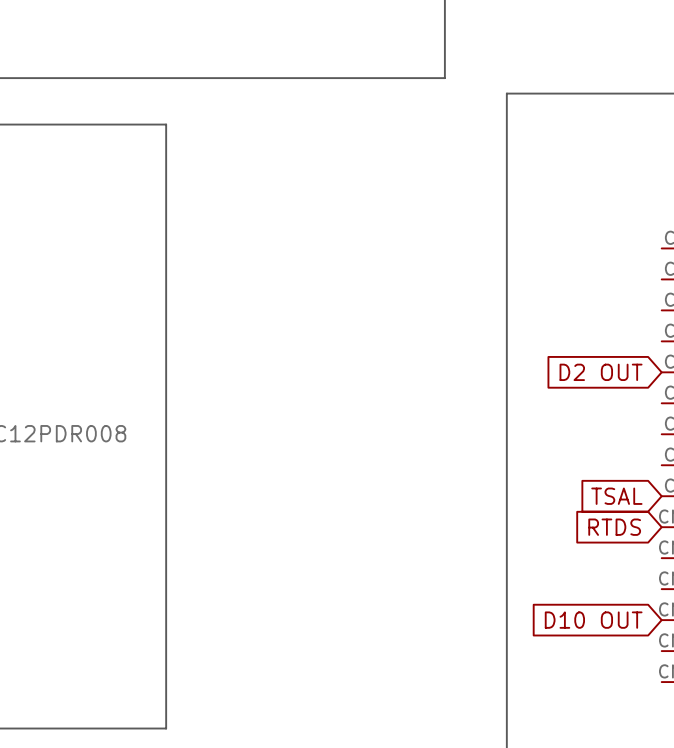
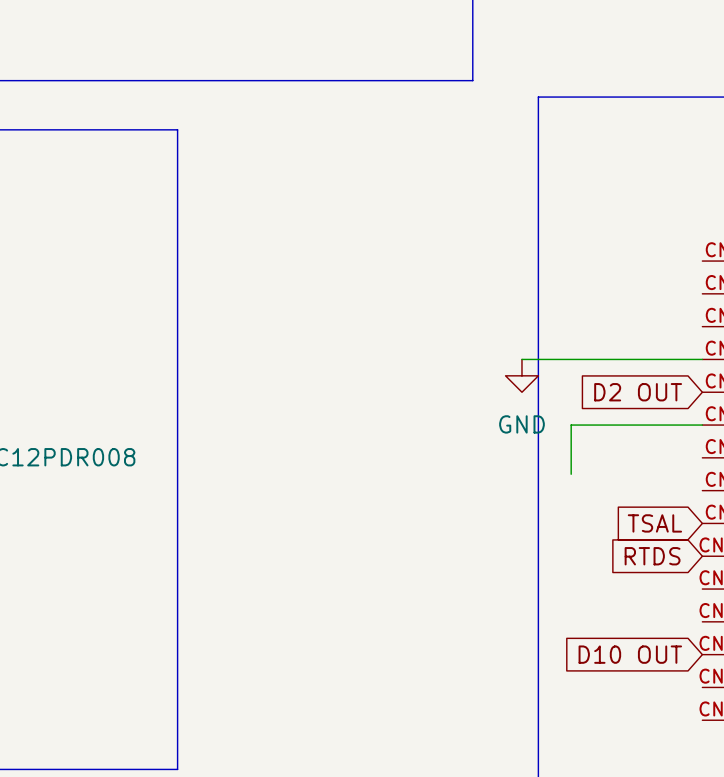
wire: none -> (521, 359) (702, 359)
power symbol: none -> GND (521, 375)
wire: none -> (702, 425) (571, 425) (571, 474)

